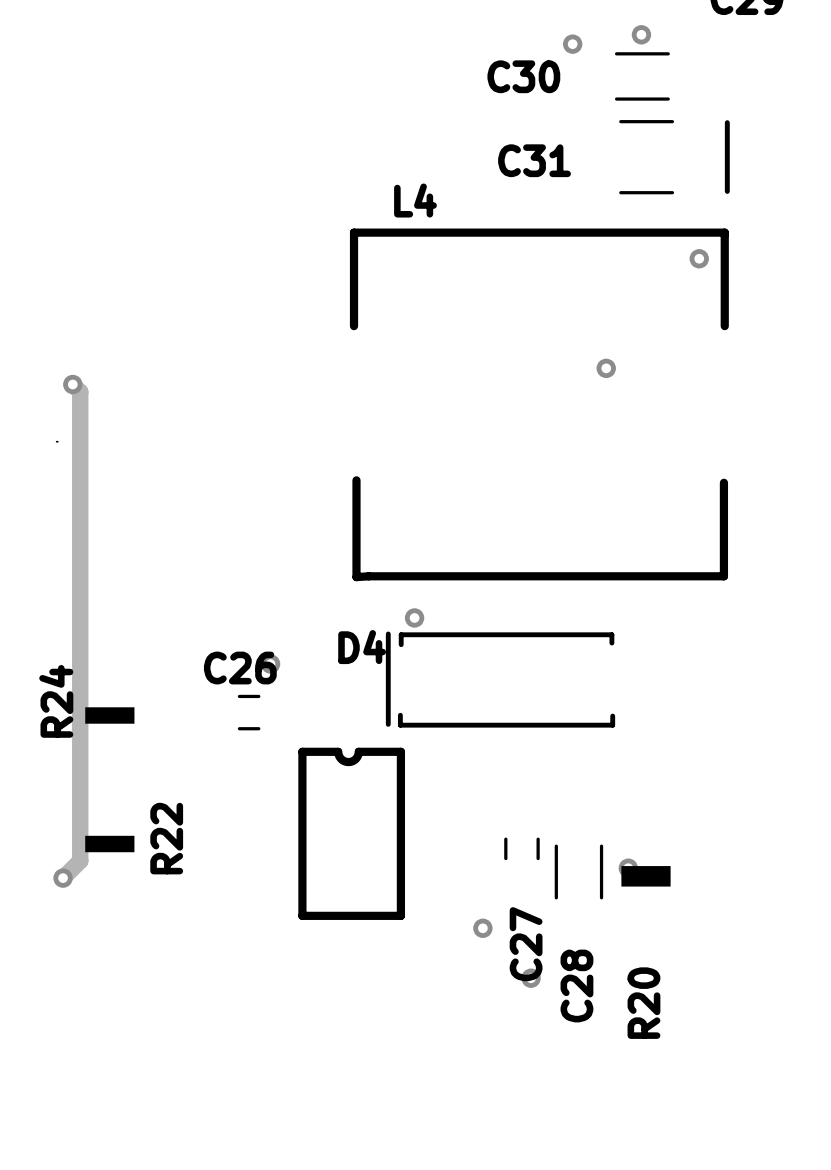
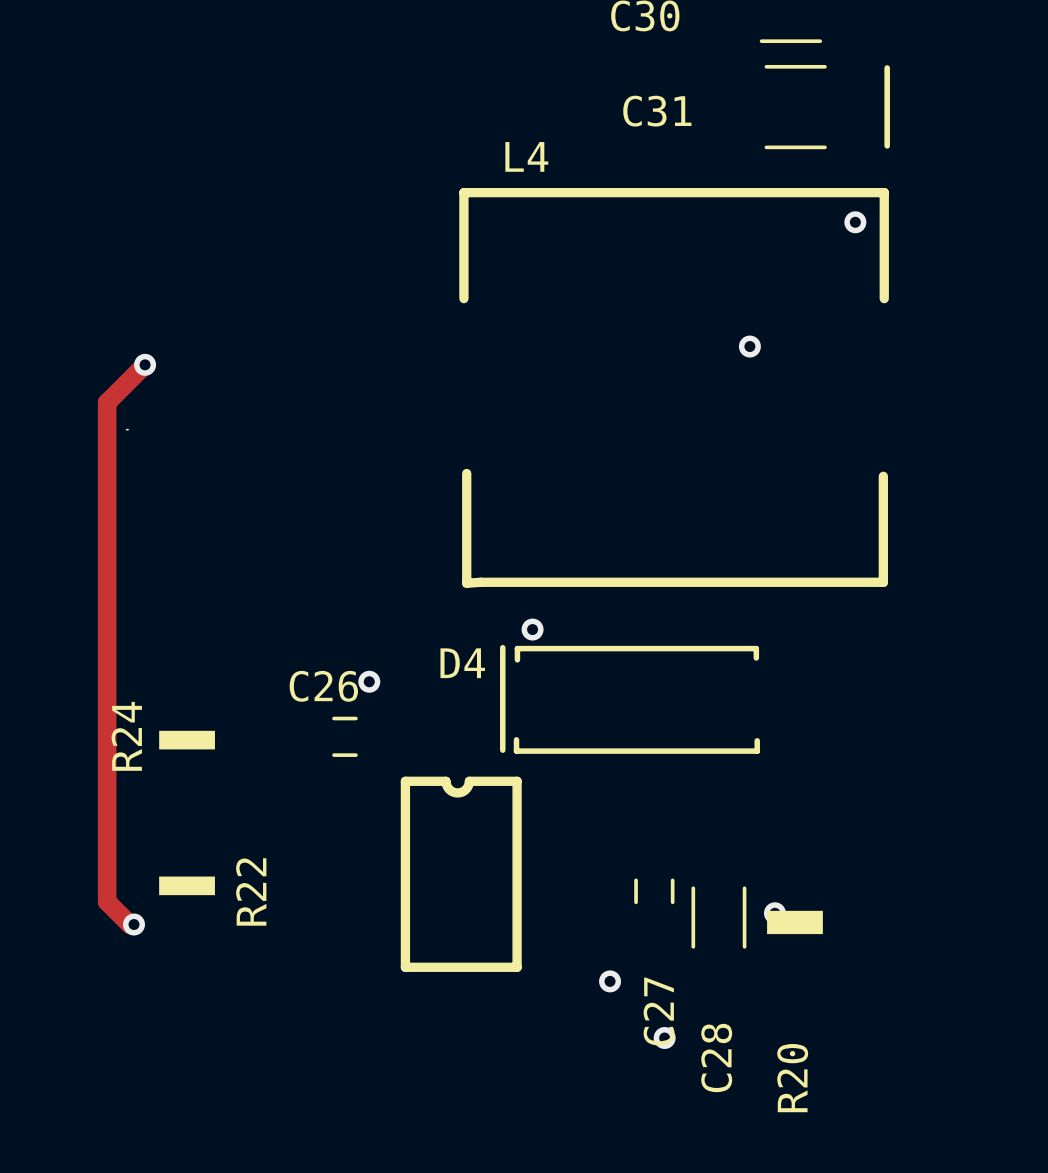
track: (72, 384) (80, 391) (80, 860) (63, 878) -> (145, 364) (107, 402) (107, 901) (129, 924) (134, 924)

